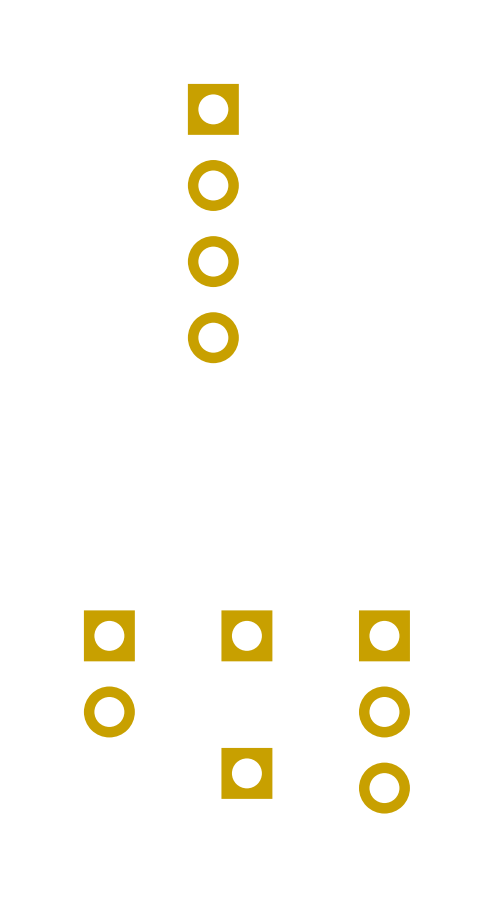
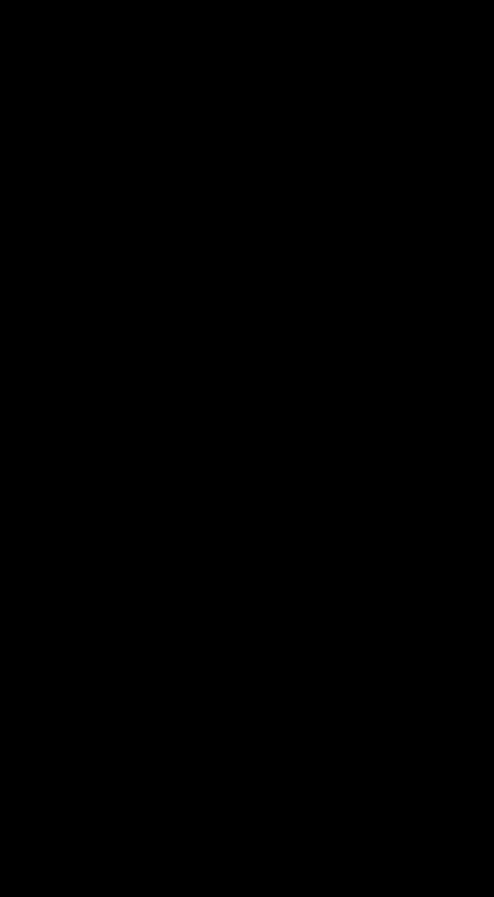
part: (213, 223) -> none
part: (246, 635) -> none
part: (109, 673) -> none
part: (384, 711) -> none
part: (246, 773) -> none

